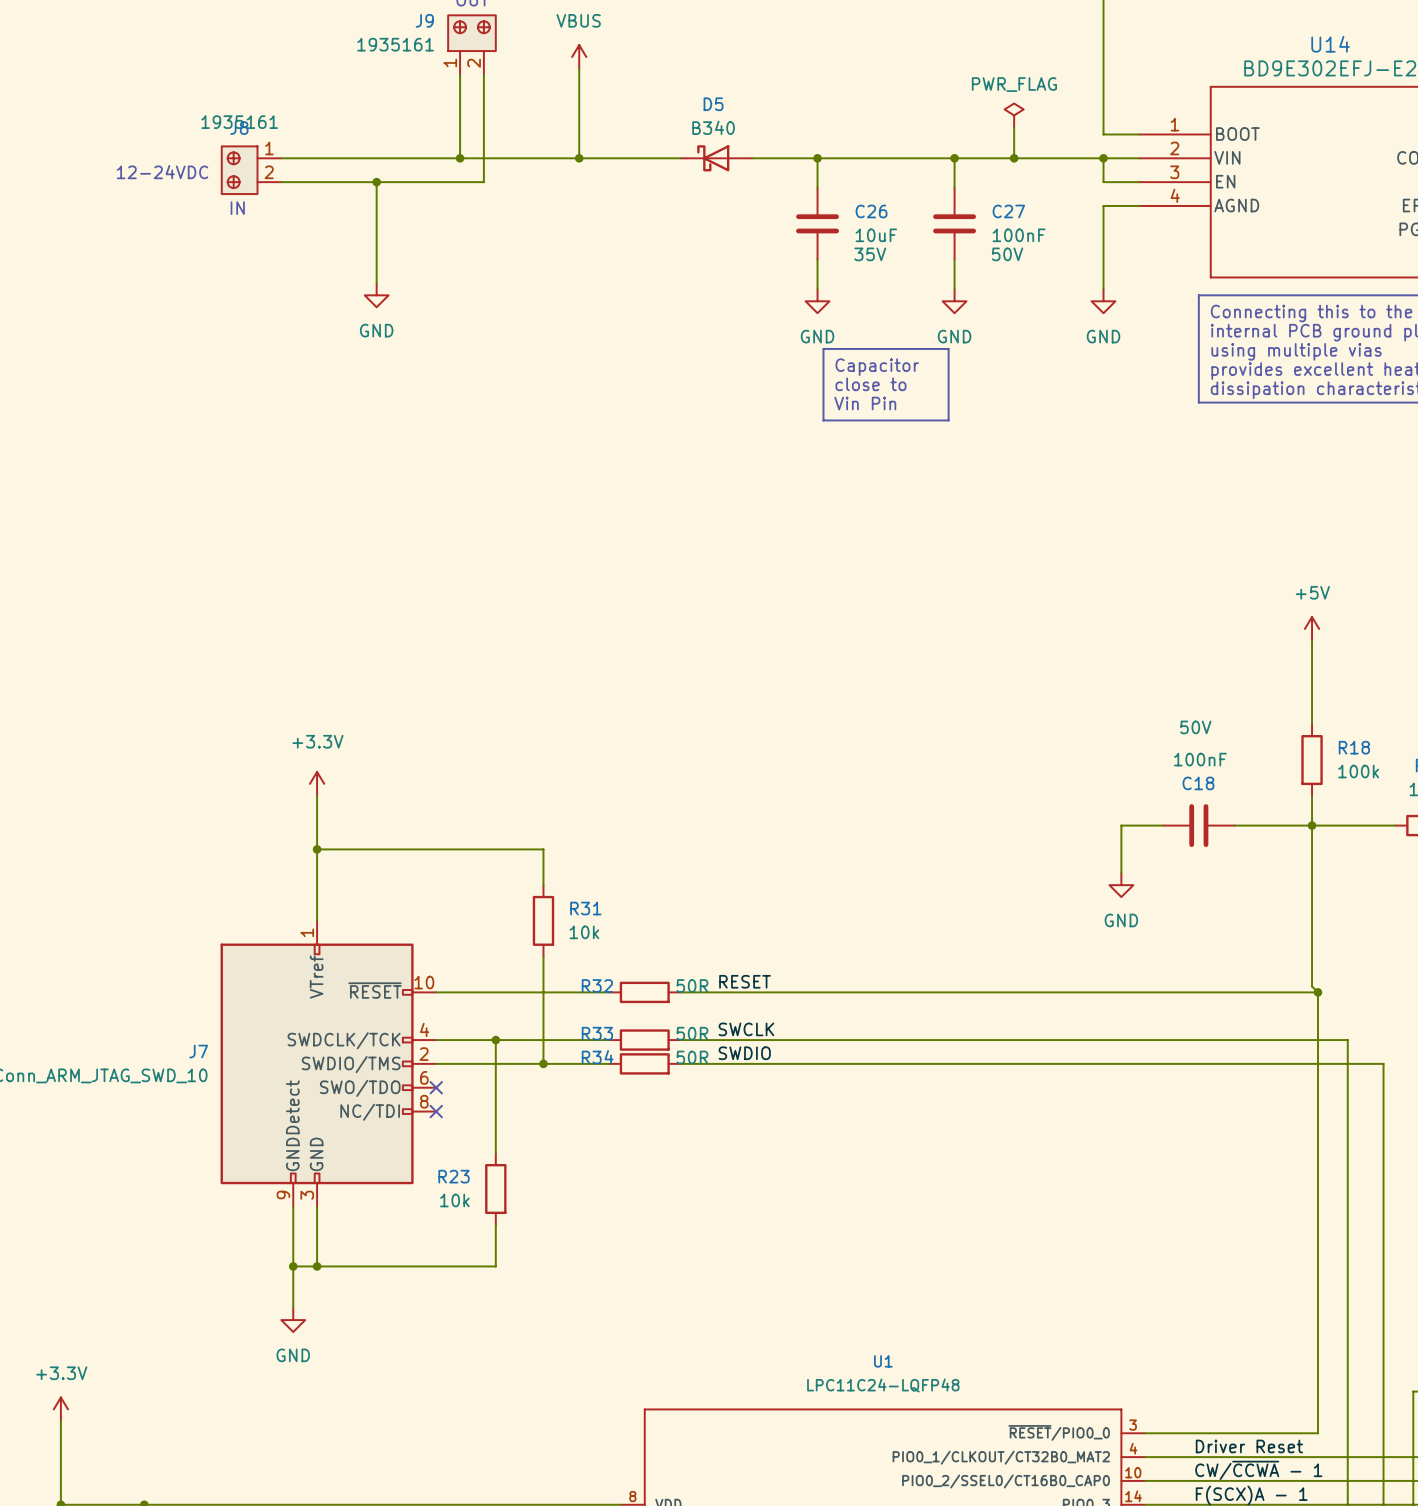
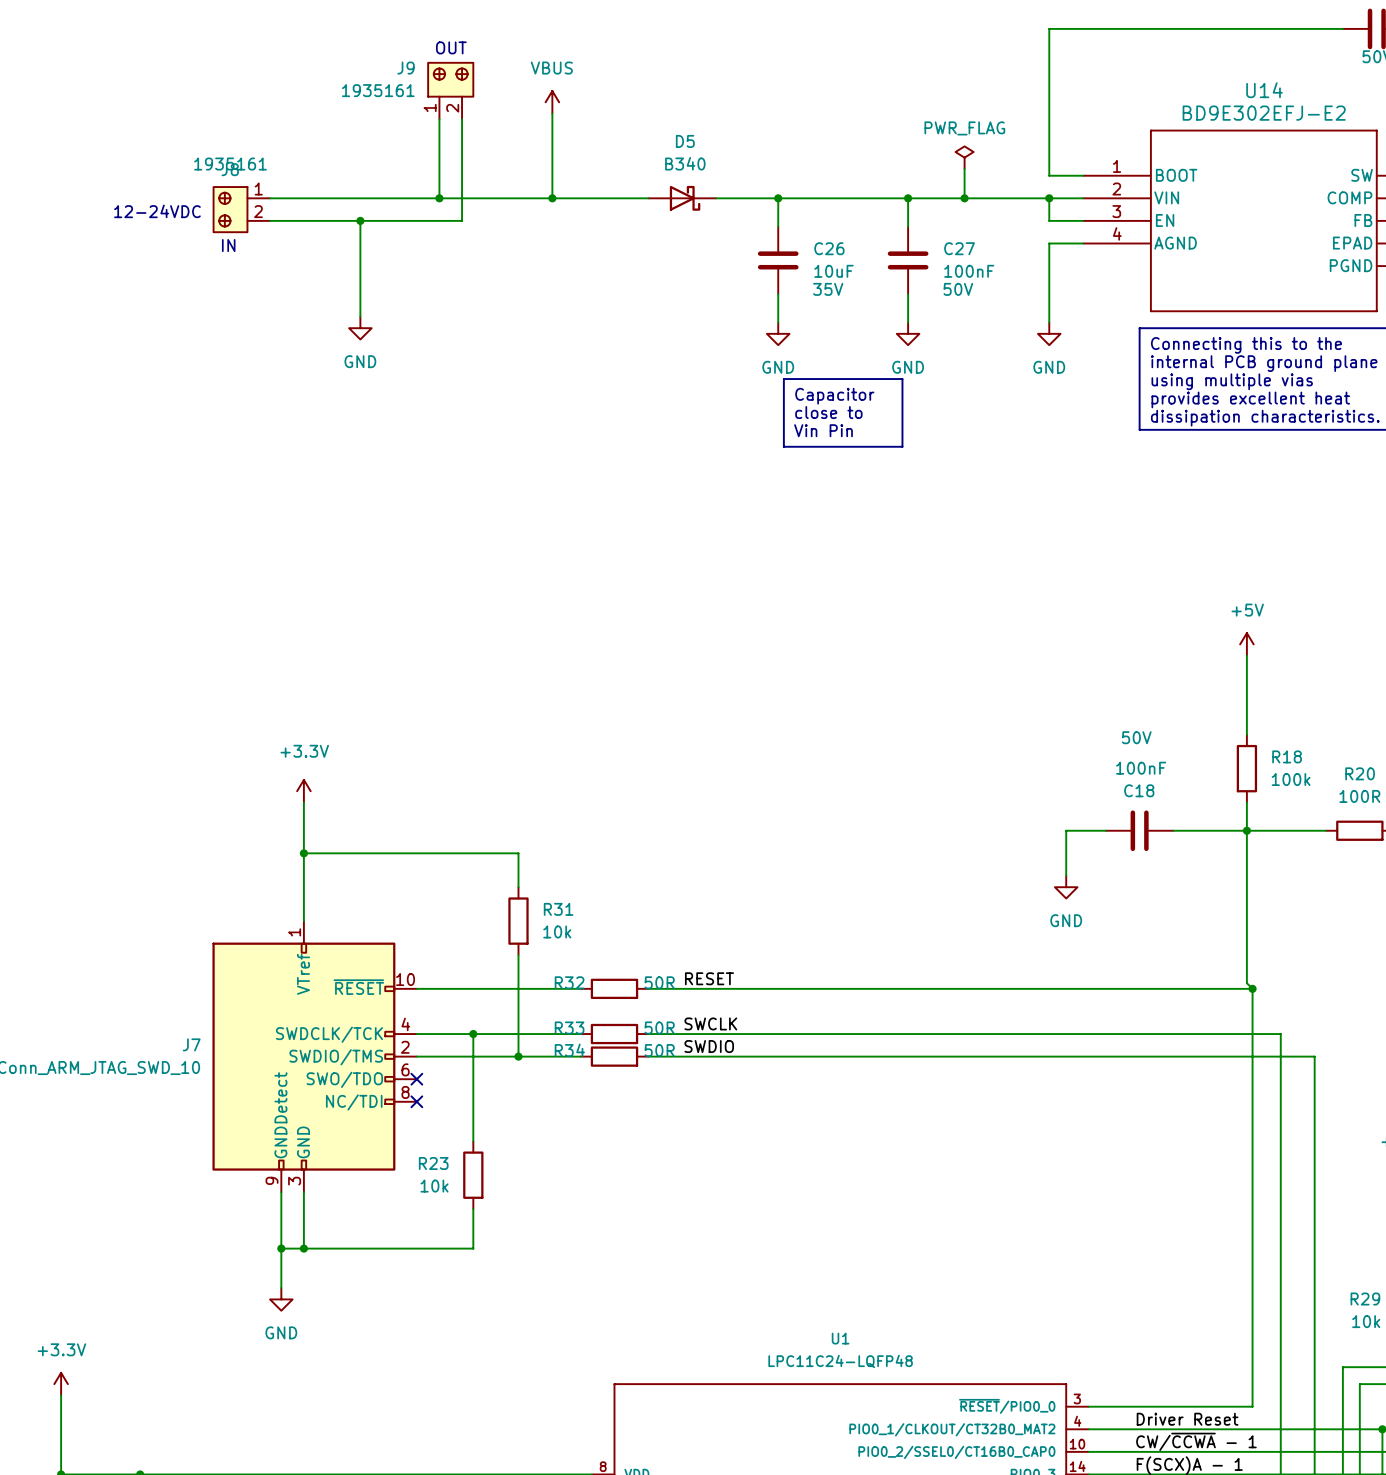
D5 rotation: 0° (713, 158) -> 180° (685, 198)

